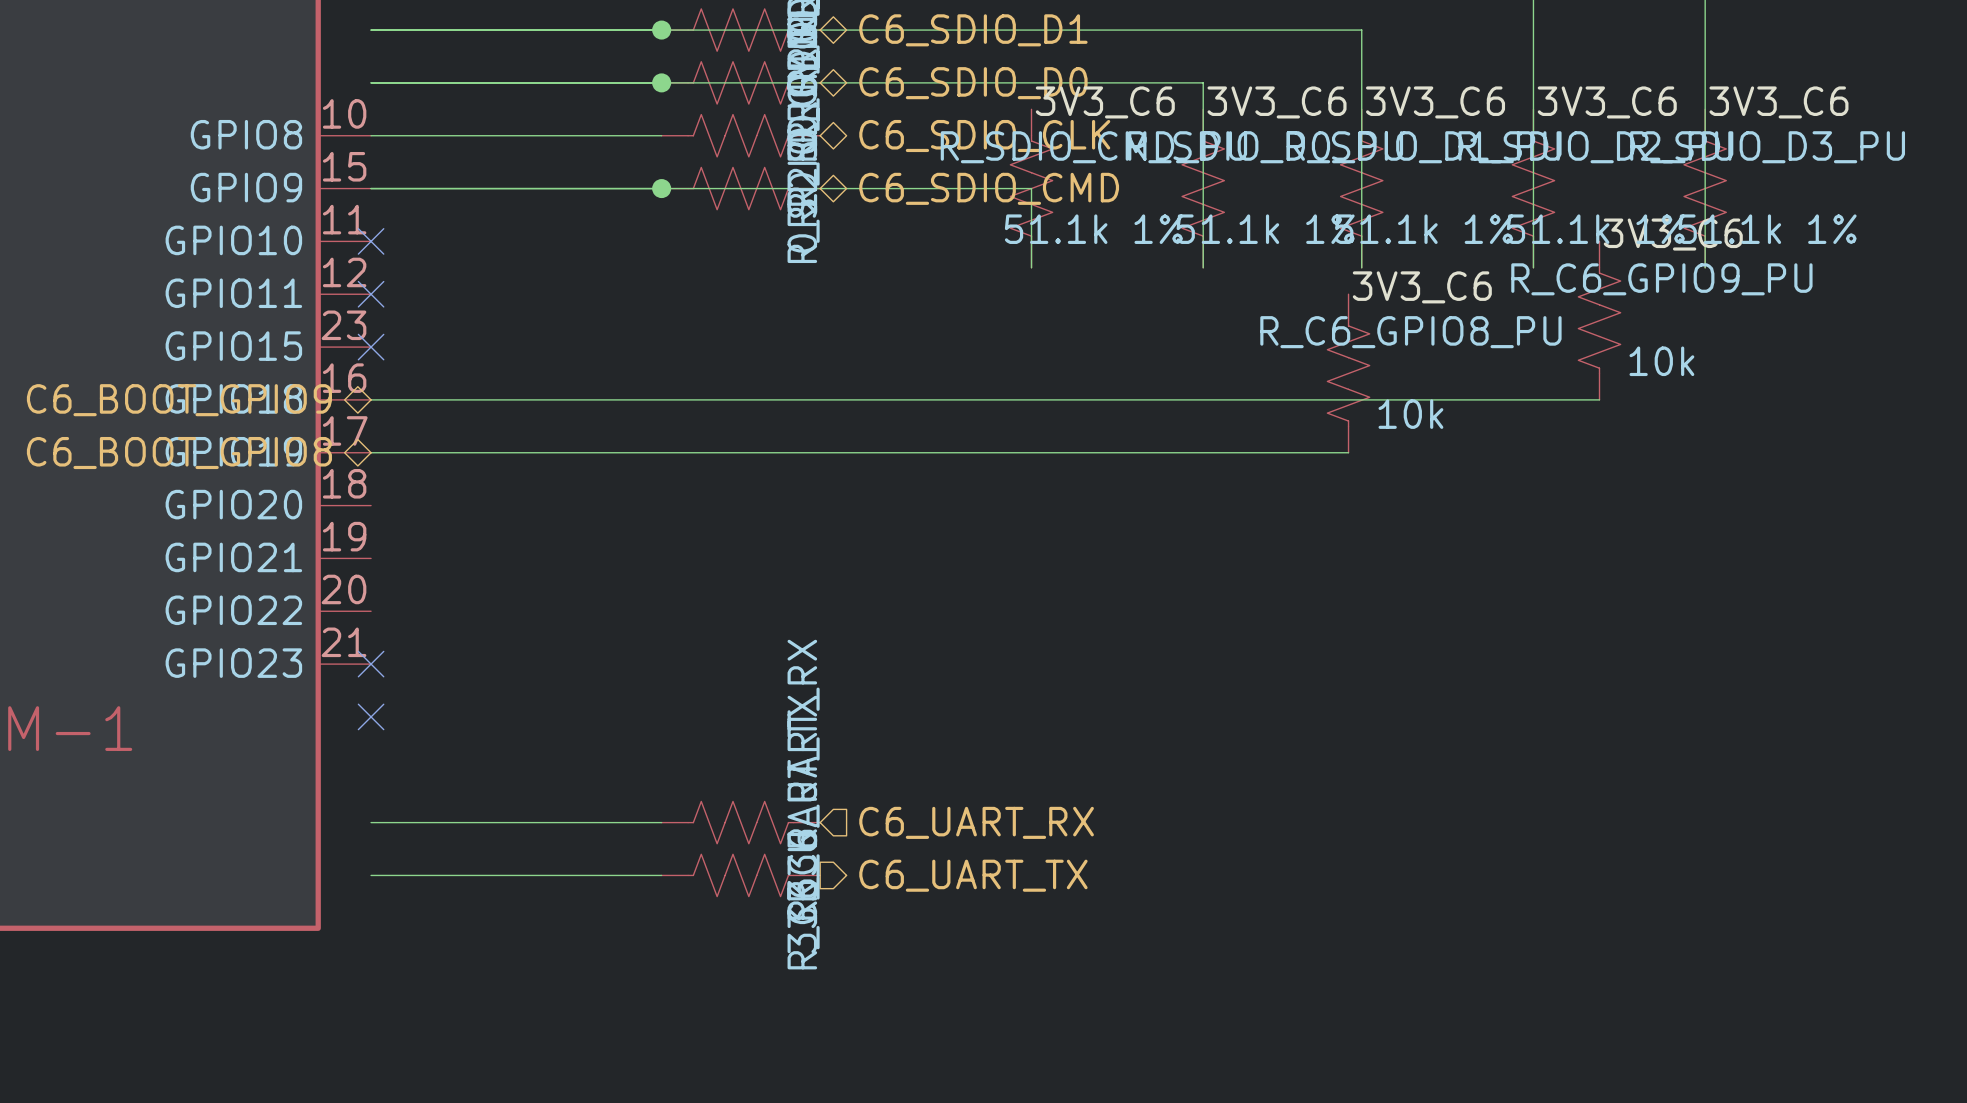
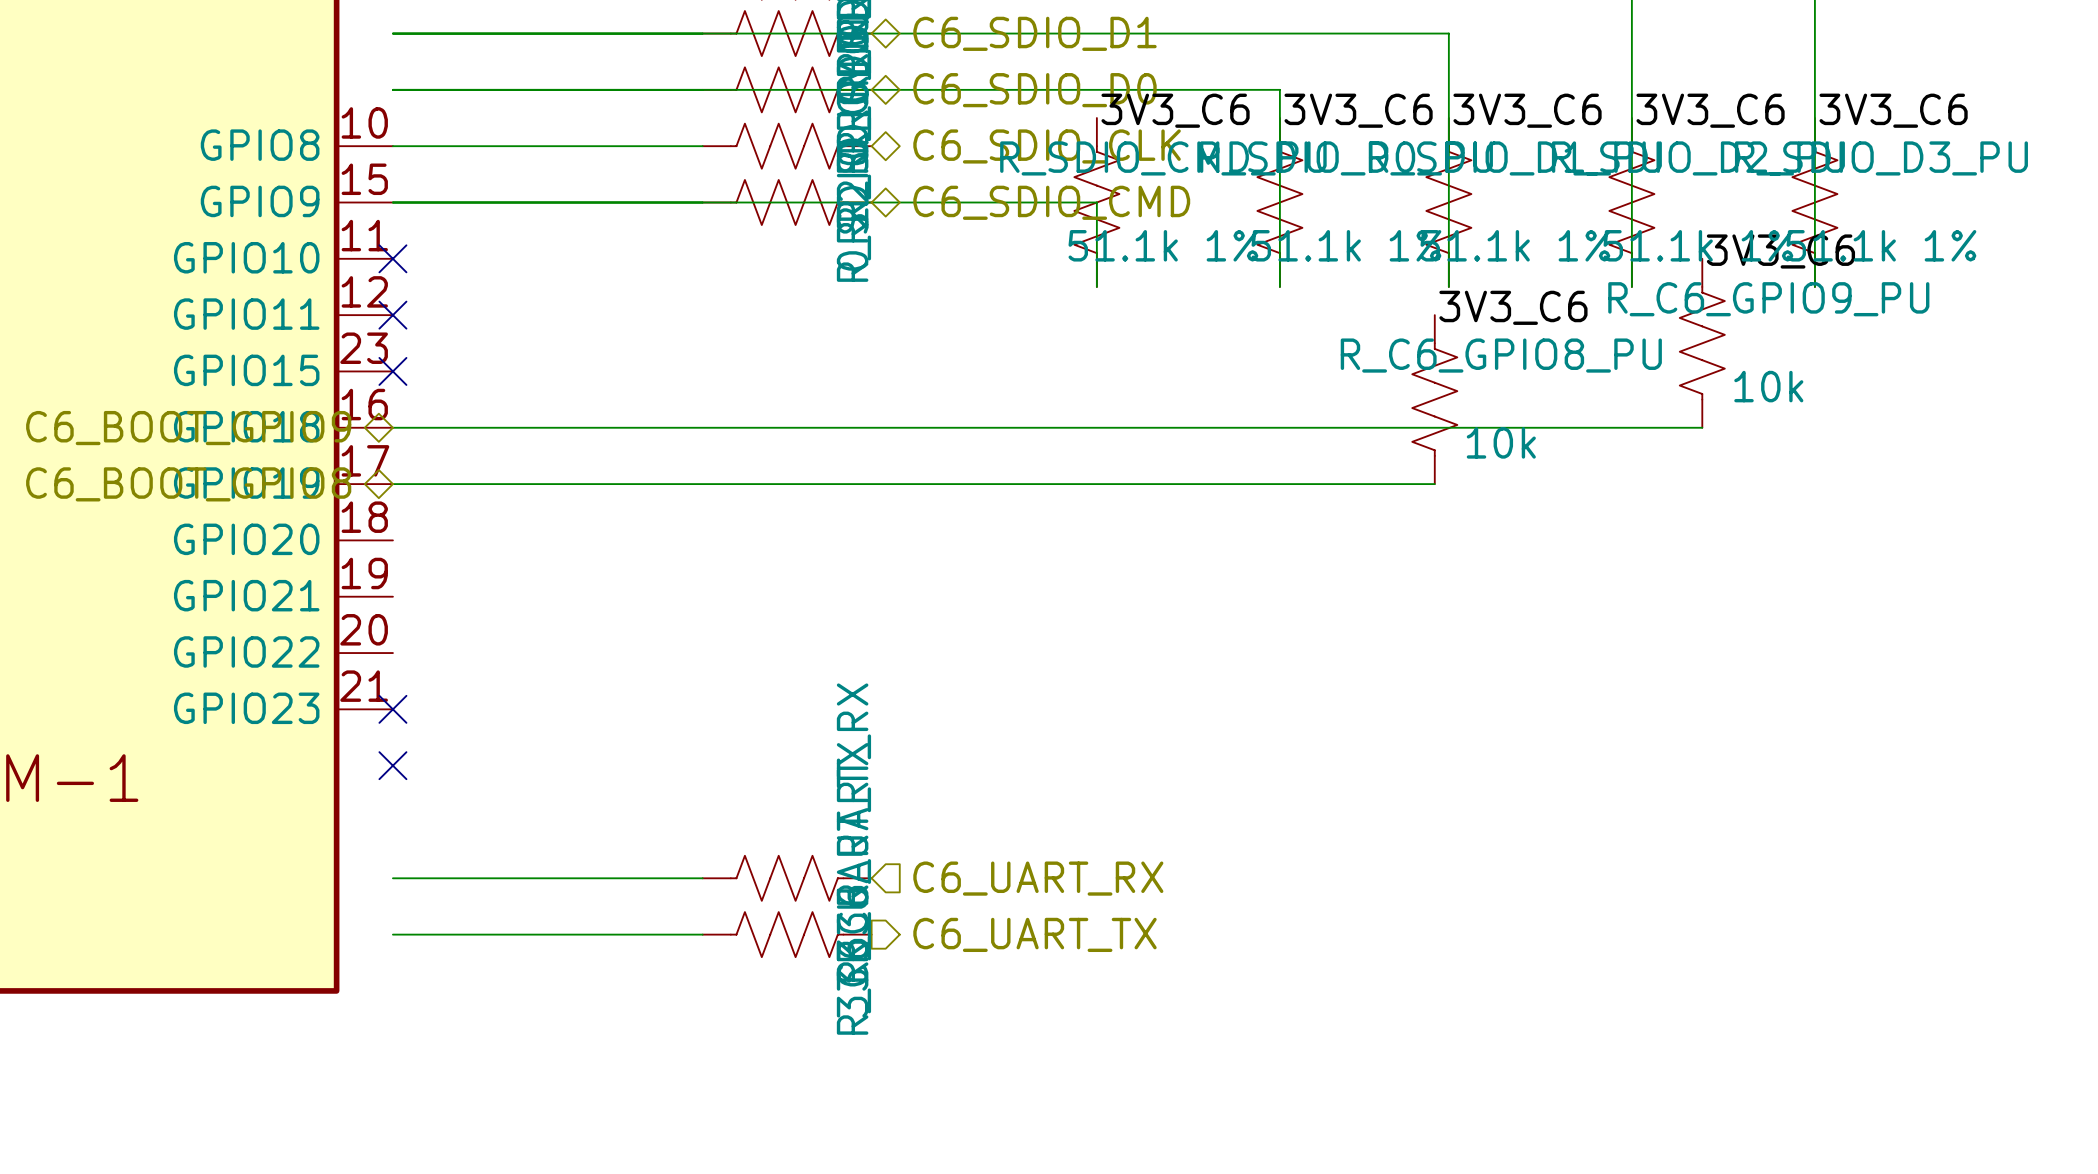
junction: (661, 30) -> none
junction: (661, 82) -> none
junction: (661, 188) -> none

